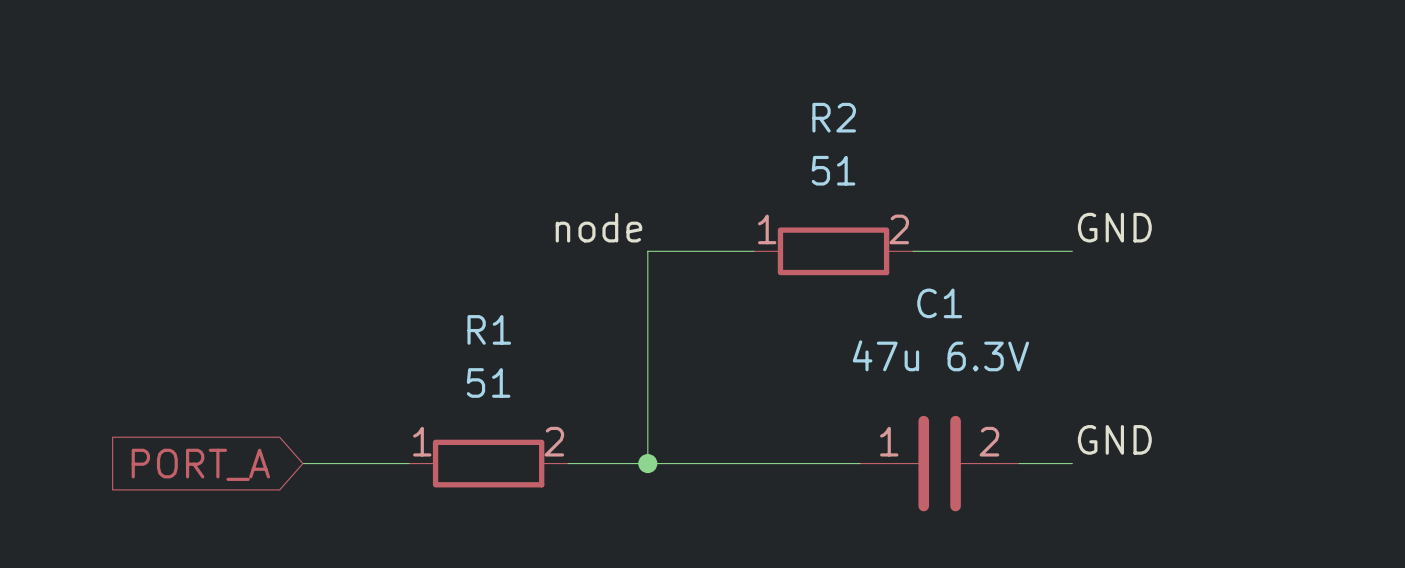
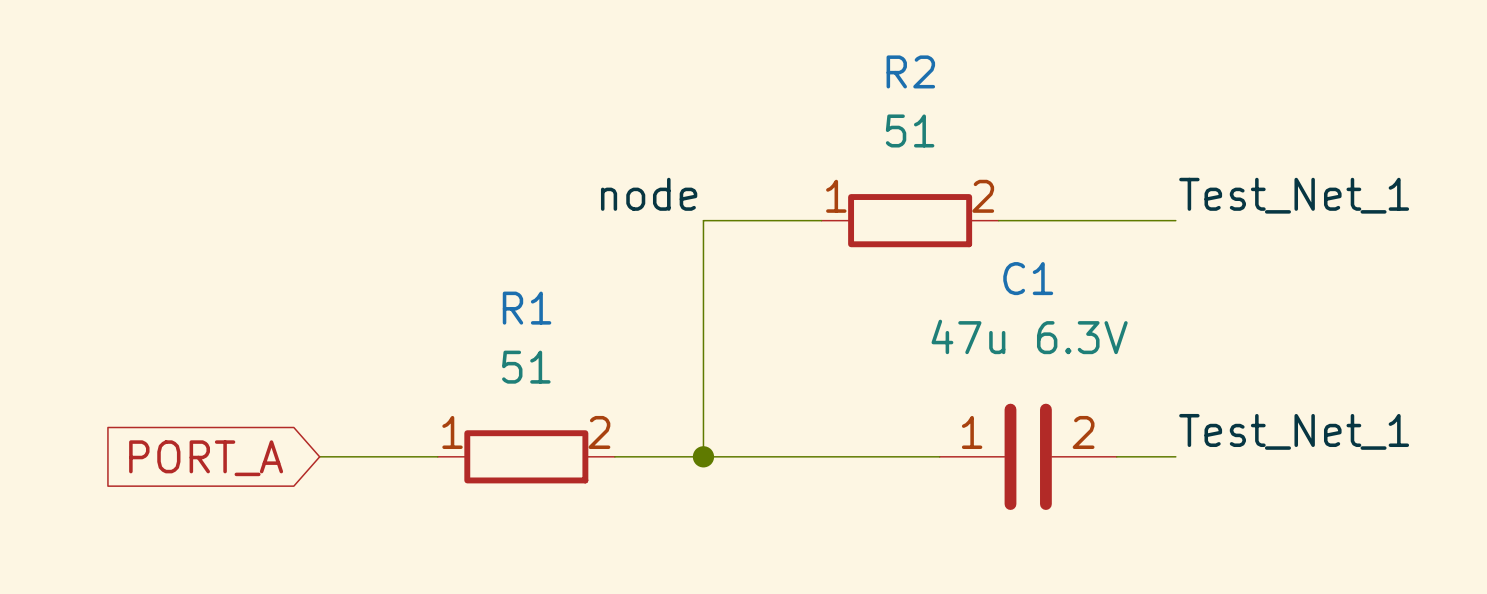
label: GND (1114, 227) -> Test_Net_1 (1294, 195)
label: GND (1114, 439) -> Test_Net_1 (1294, 431)

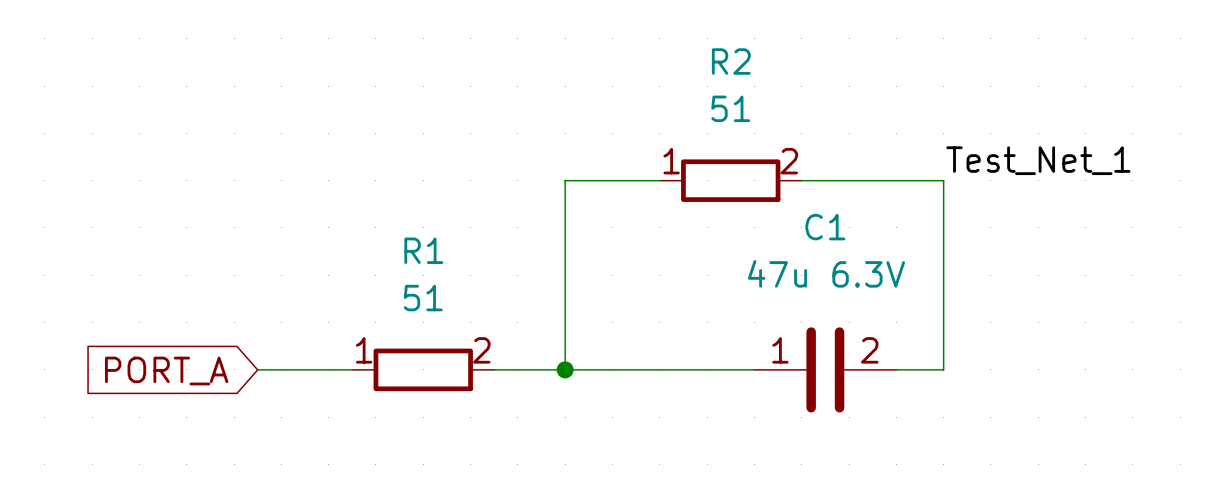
label: node (649, 194) -> none
wire: none -> (943, 180) (943, 369)
label: Test_Net_1 (1294, 431) -> none

